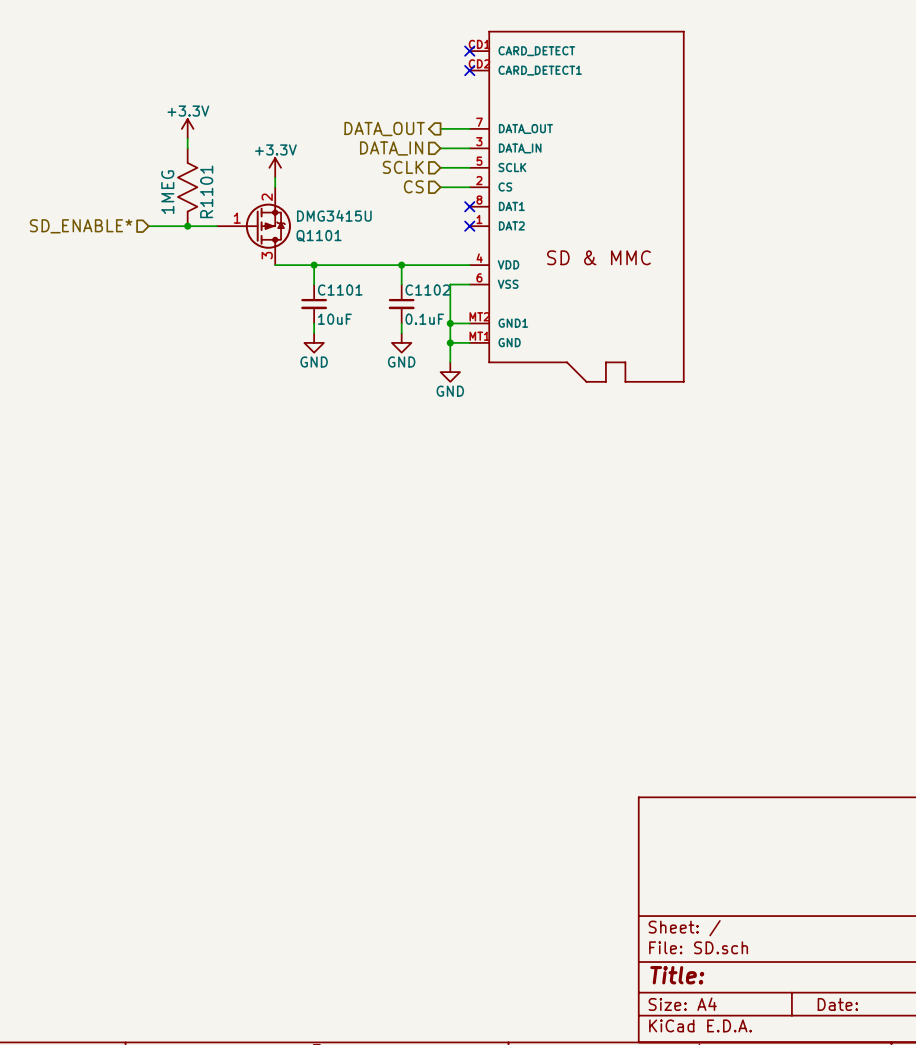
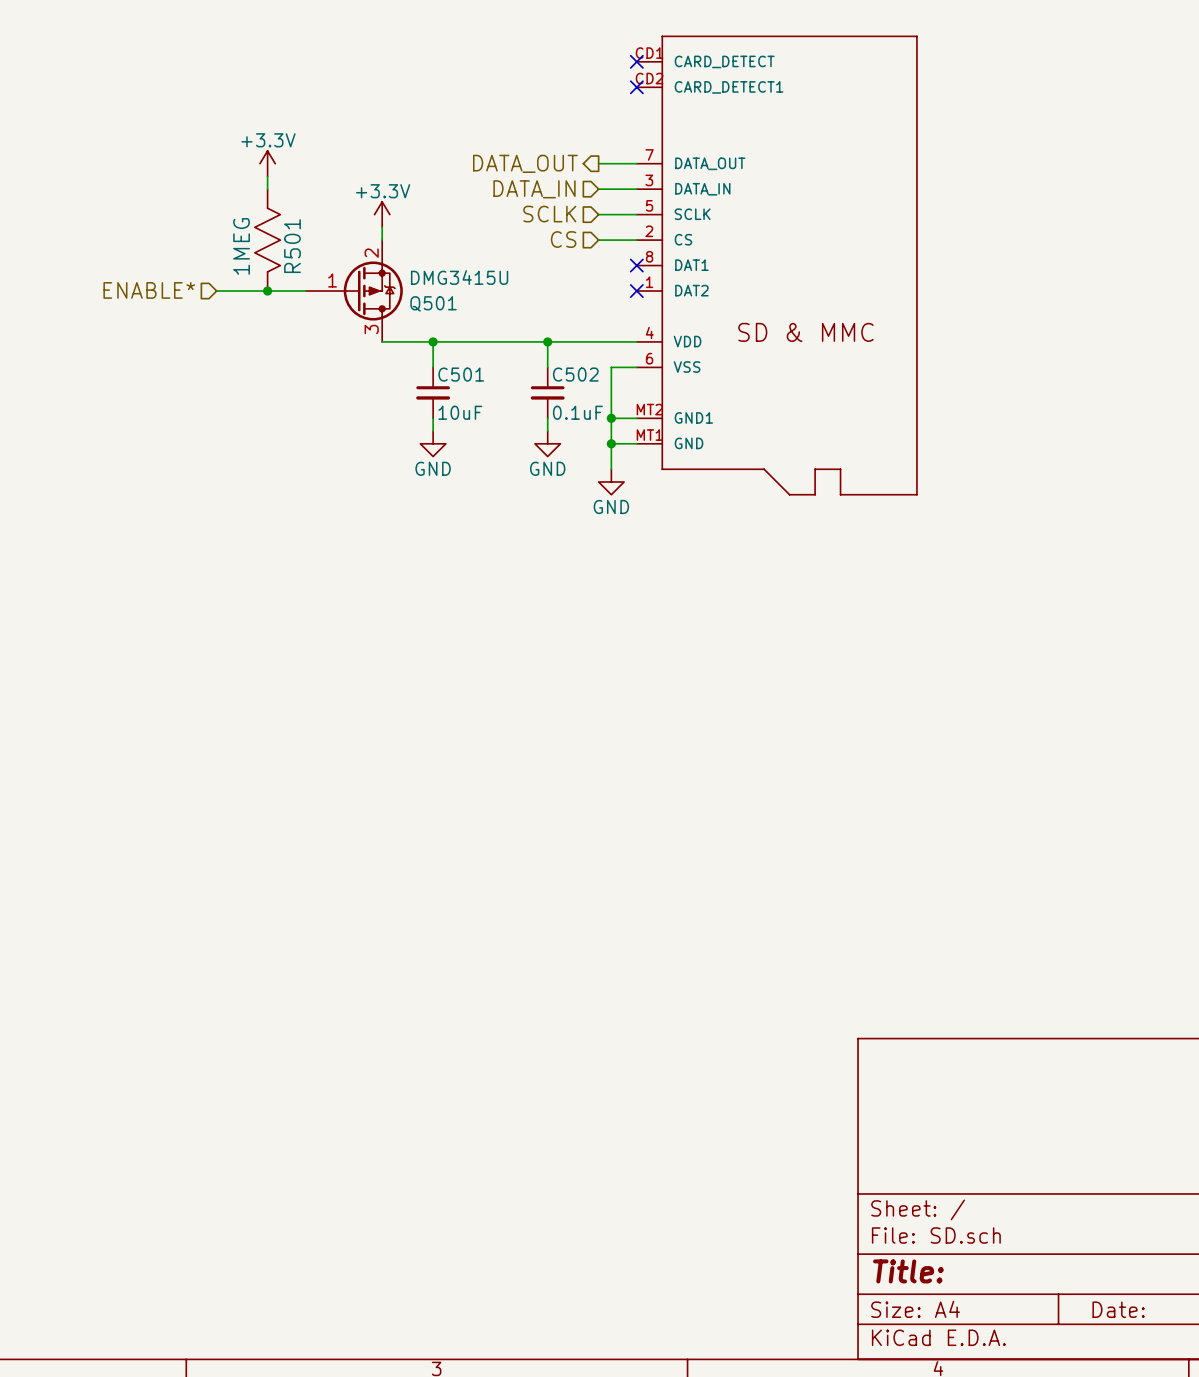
R1101 name: R1101 (206, 191) -> R501 (292, 246)
hierarchical label: SD_ENABLE* (81, 226) -> ENABLE* (149, 290)
Q1101 name: Q1101 (319, 236) -> Q501 (433, 303)
C1101 name: C1101 (340, 290) -> C501 (461, 374)
C1102 name: C1102 (427, 290) -> C502 (575, 374)

